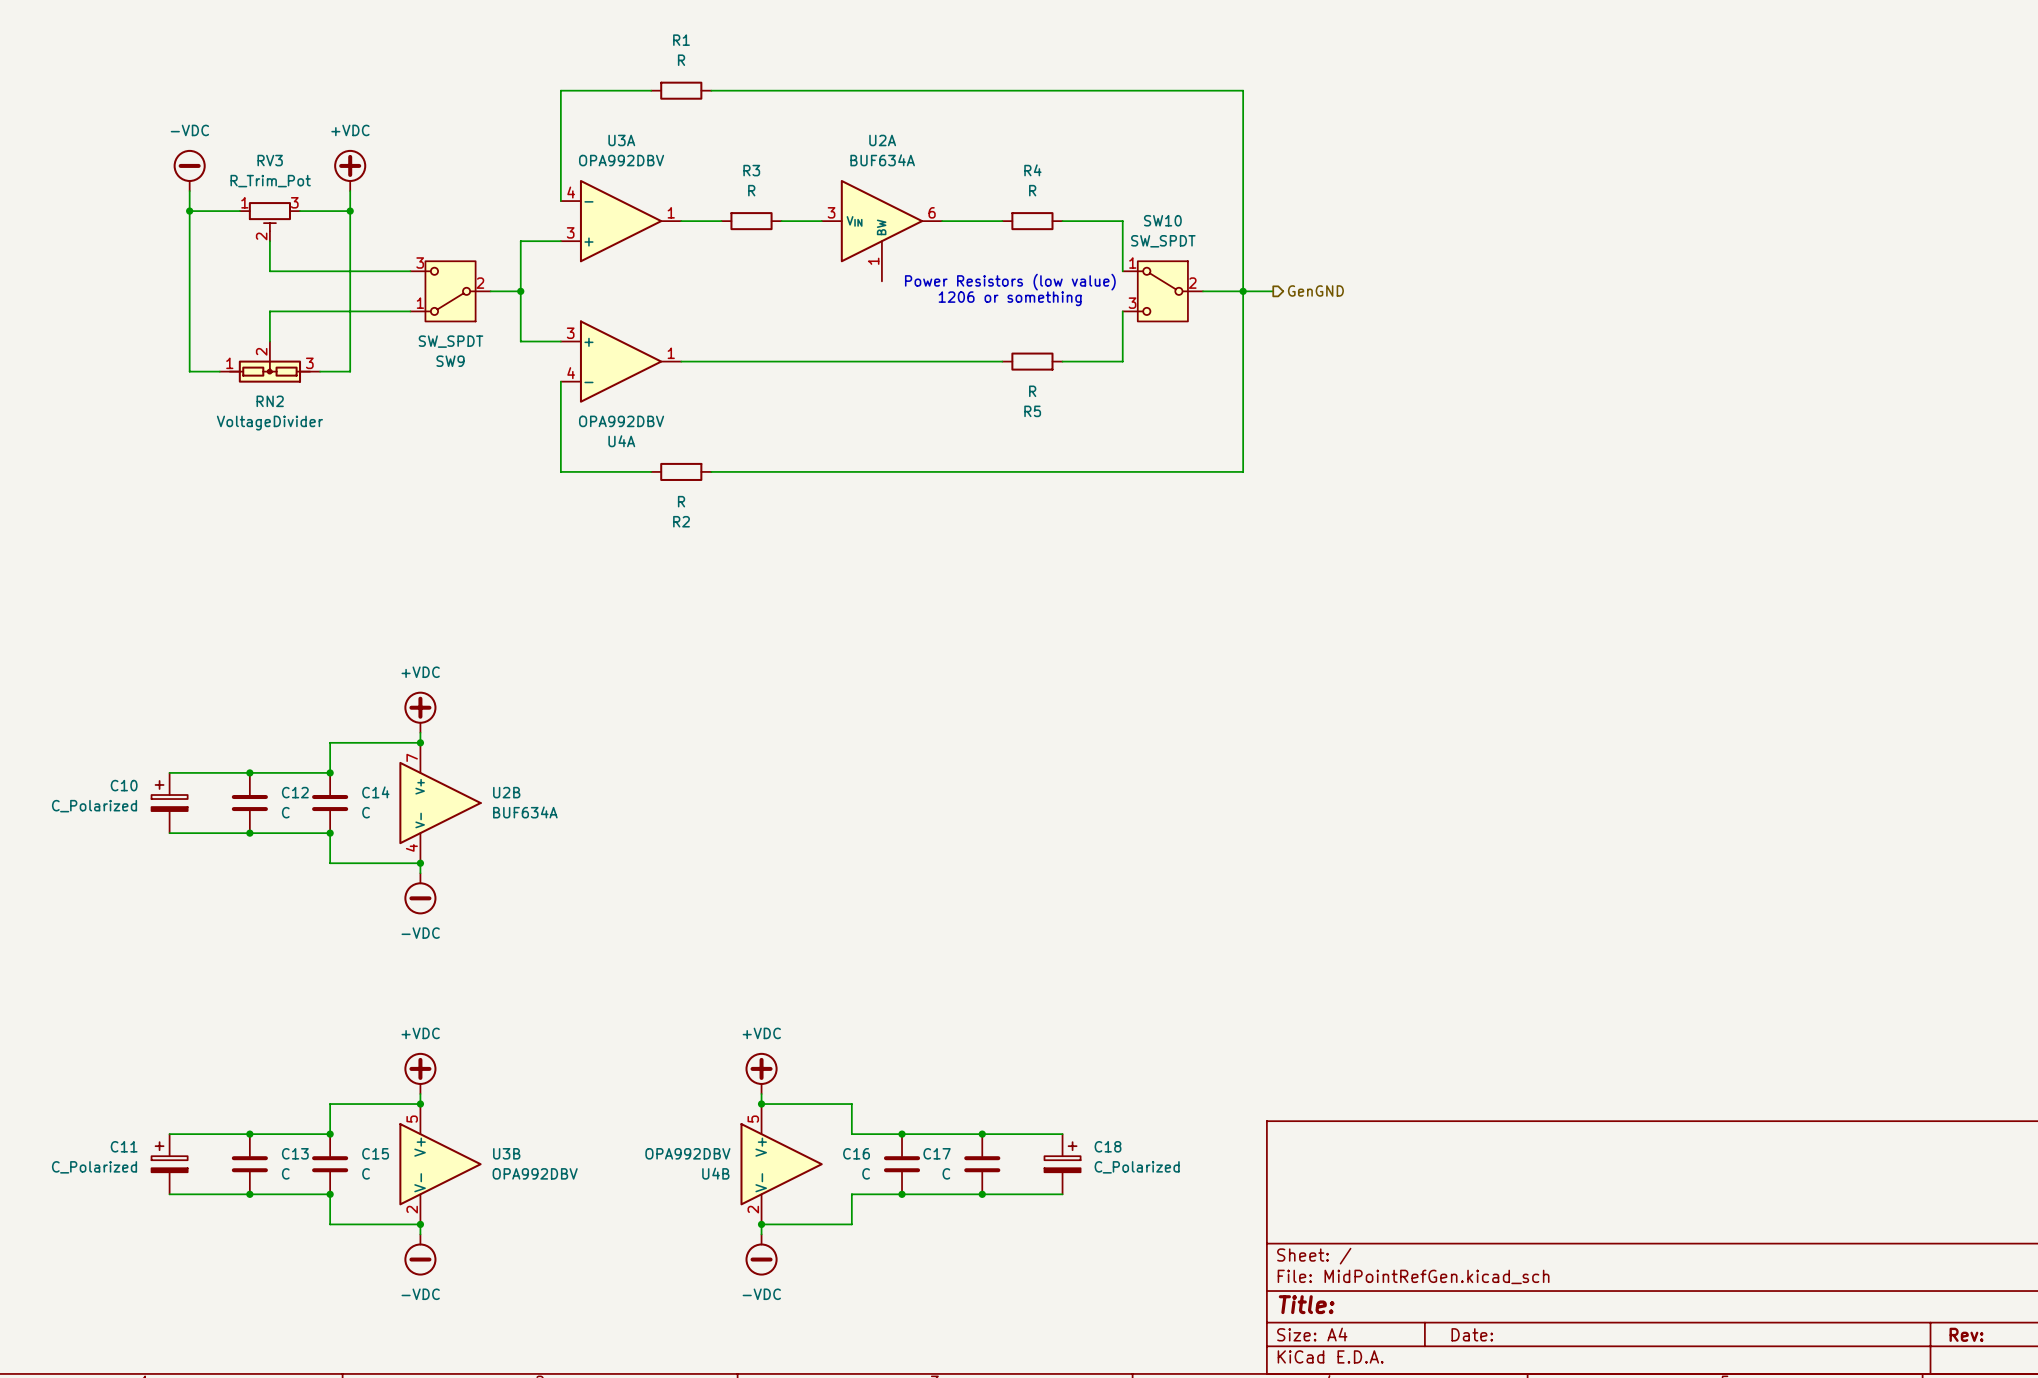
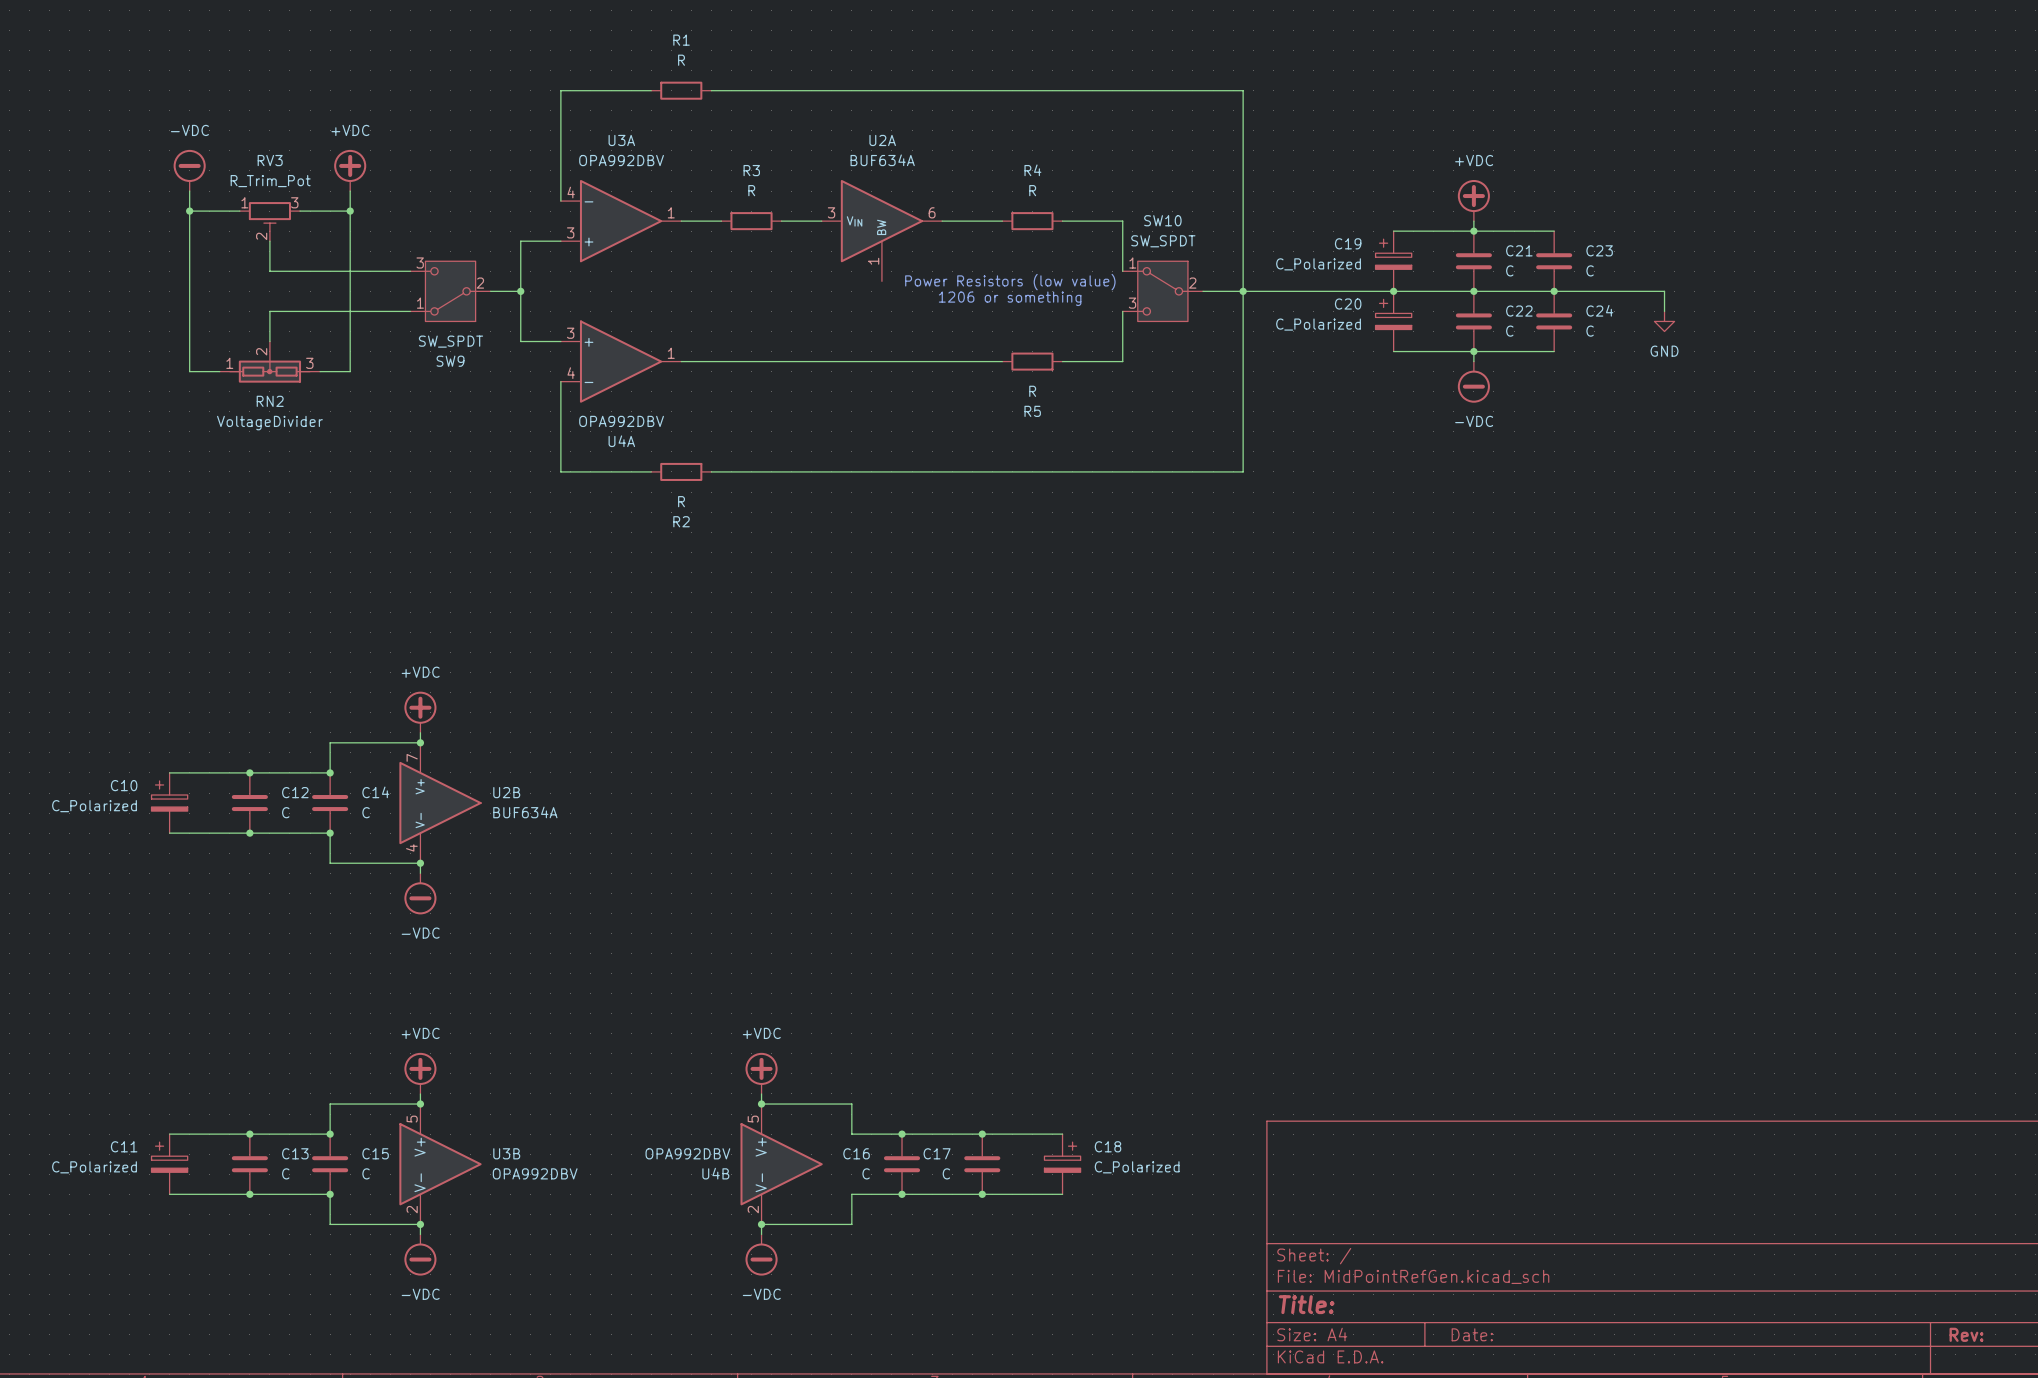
power symbol: none -> +VDC (1473, 200)
wire: none -> (1473, 221) (1473, 231)
wire: none -> (1393, 231) (1554, 231)
junction: none -> (1473, 231)
C19: none -> C_Polarized (1393, 261)
C21: none -> C (1473, 261)
C23: none -> C (1554, 261)
hierarchical label: GenGND (1315, 290) -> none
wire: none -> (1273, 291) (1664, 291) (1664, 311)
junction: none -> (1393, 291)
junction: none -> (1473, 291)
junction: none -> (1554, 291)
C20: none -> C_Polarized (1393, 321)
C22: none -> C (1473, 321)
C24: none -> C (1554, 321)
power symbol: none -> GND (1664, 321)
wire: none -> (1393, 351) (1554, 351)
wire: none -> (1473, 351) (1473, 361)
junction: none -> (1473, 351)
power symbol: none -> -VDC (1473, 382)

